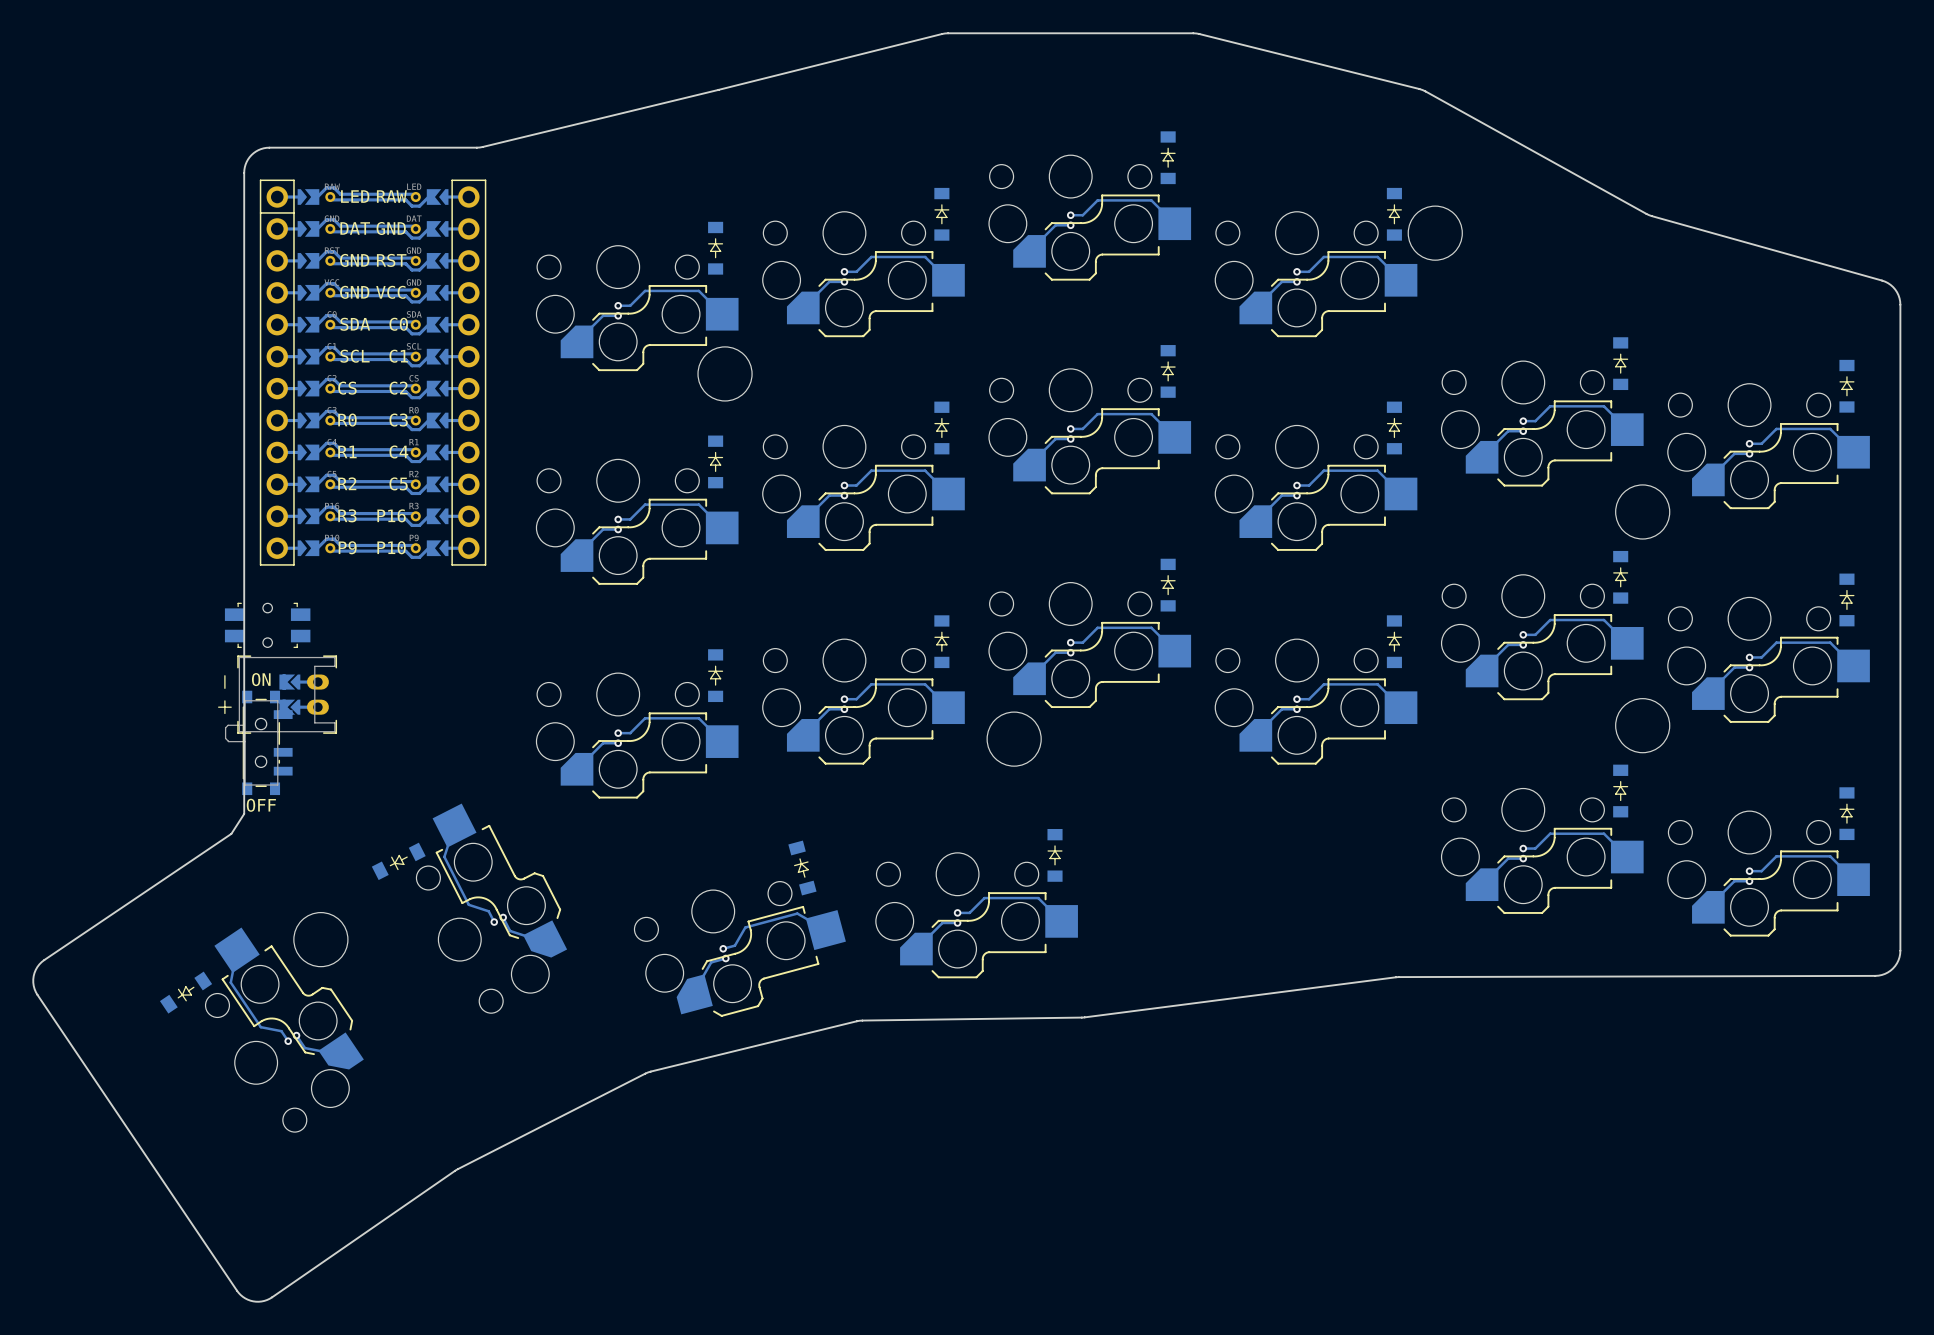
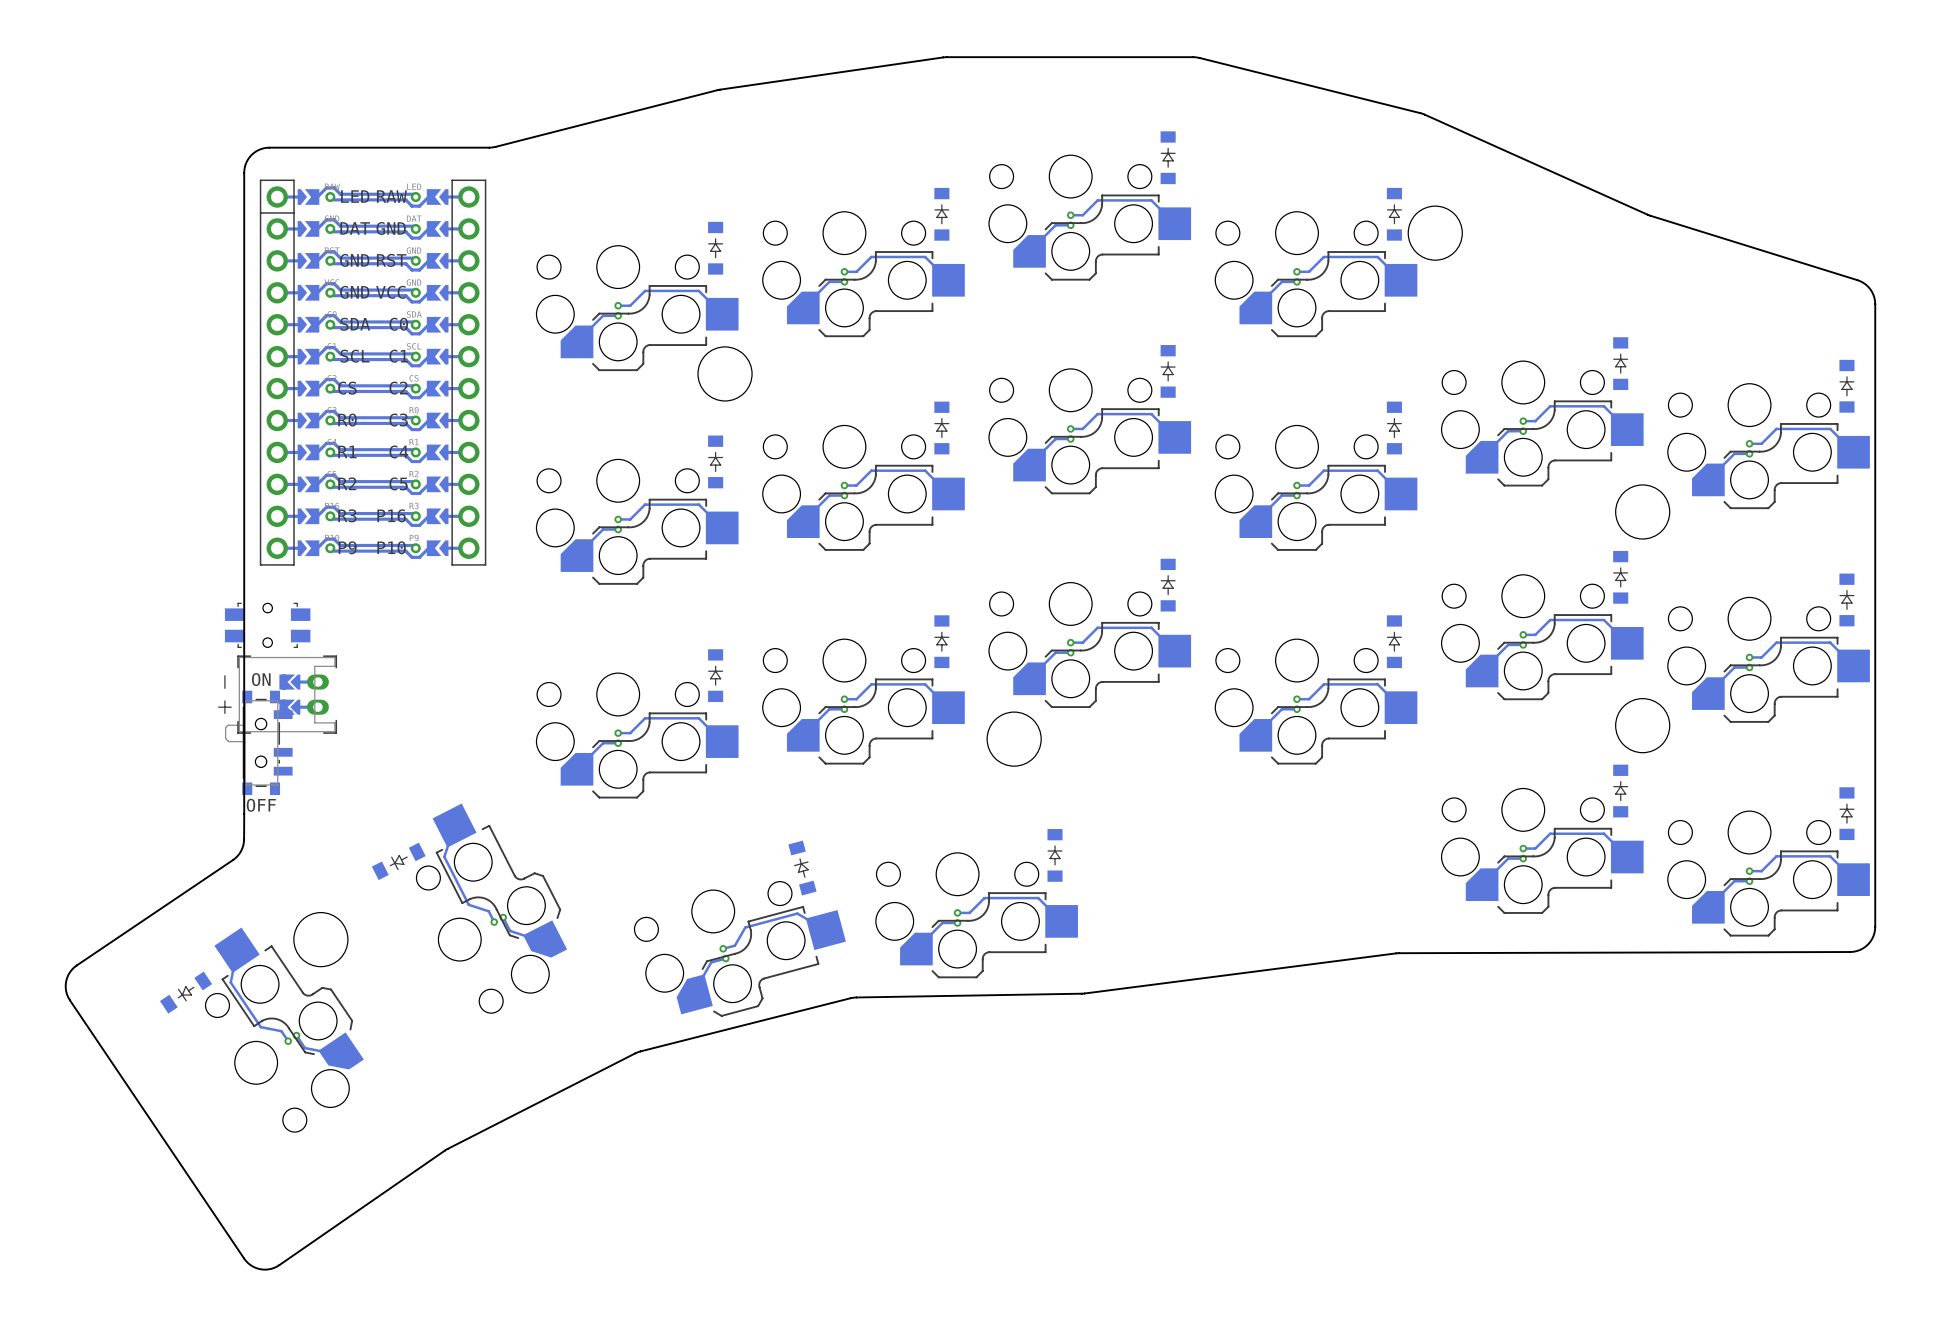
board edge: (476, 147) (945, 33) (1196, 33) (1422, 90) (1649, 215) (1888, 283) (1897, 292) (1900, 304) (1900, 950) (1898, 960) (1893, 968) (1884, 973) (1875, 975) -> none
board edge: (244, 813) (231, 833) (41, 962) (35, 969) (33, 982) (37, 994) (237, 1290) (245, 1298) (256, 1301) (272, 1297) (456, 1169) (645, 1073) (856, 1021) (1083, 1017) (1397, 977) (1875, 975) -> (244, 813) (243, 845) (235, 858) (76, 965) (68, 975) (65, 988) (69, 1000) (244, 1258) (252, 1266) (263, 1269) (279, 1265) (446, 1149) (635, 1053) (850, 998) (1083, 993) (1397, 953) (1850, 952) (1862, 948) (1873, 936) (1875, 926) (1875, 304) (1872, 291) (1863, 282) (1648, 215) (1422, 113) (1196, 57) (943, 57) (718, 89) (495, 146) (476, 147)

